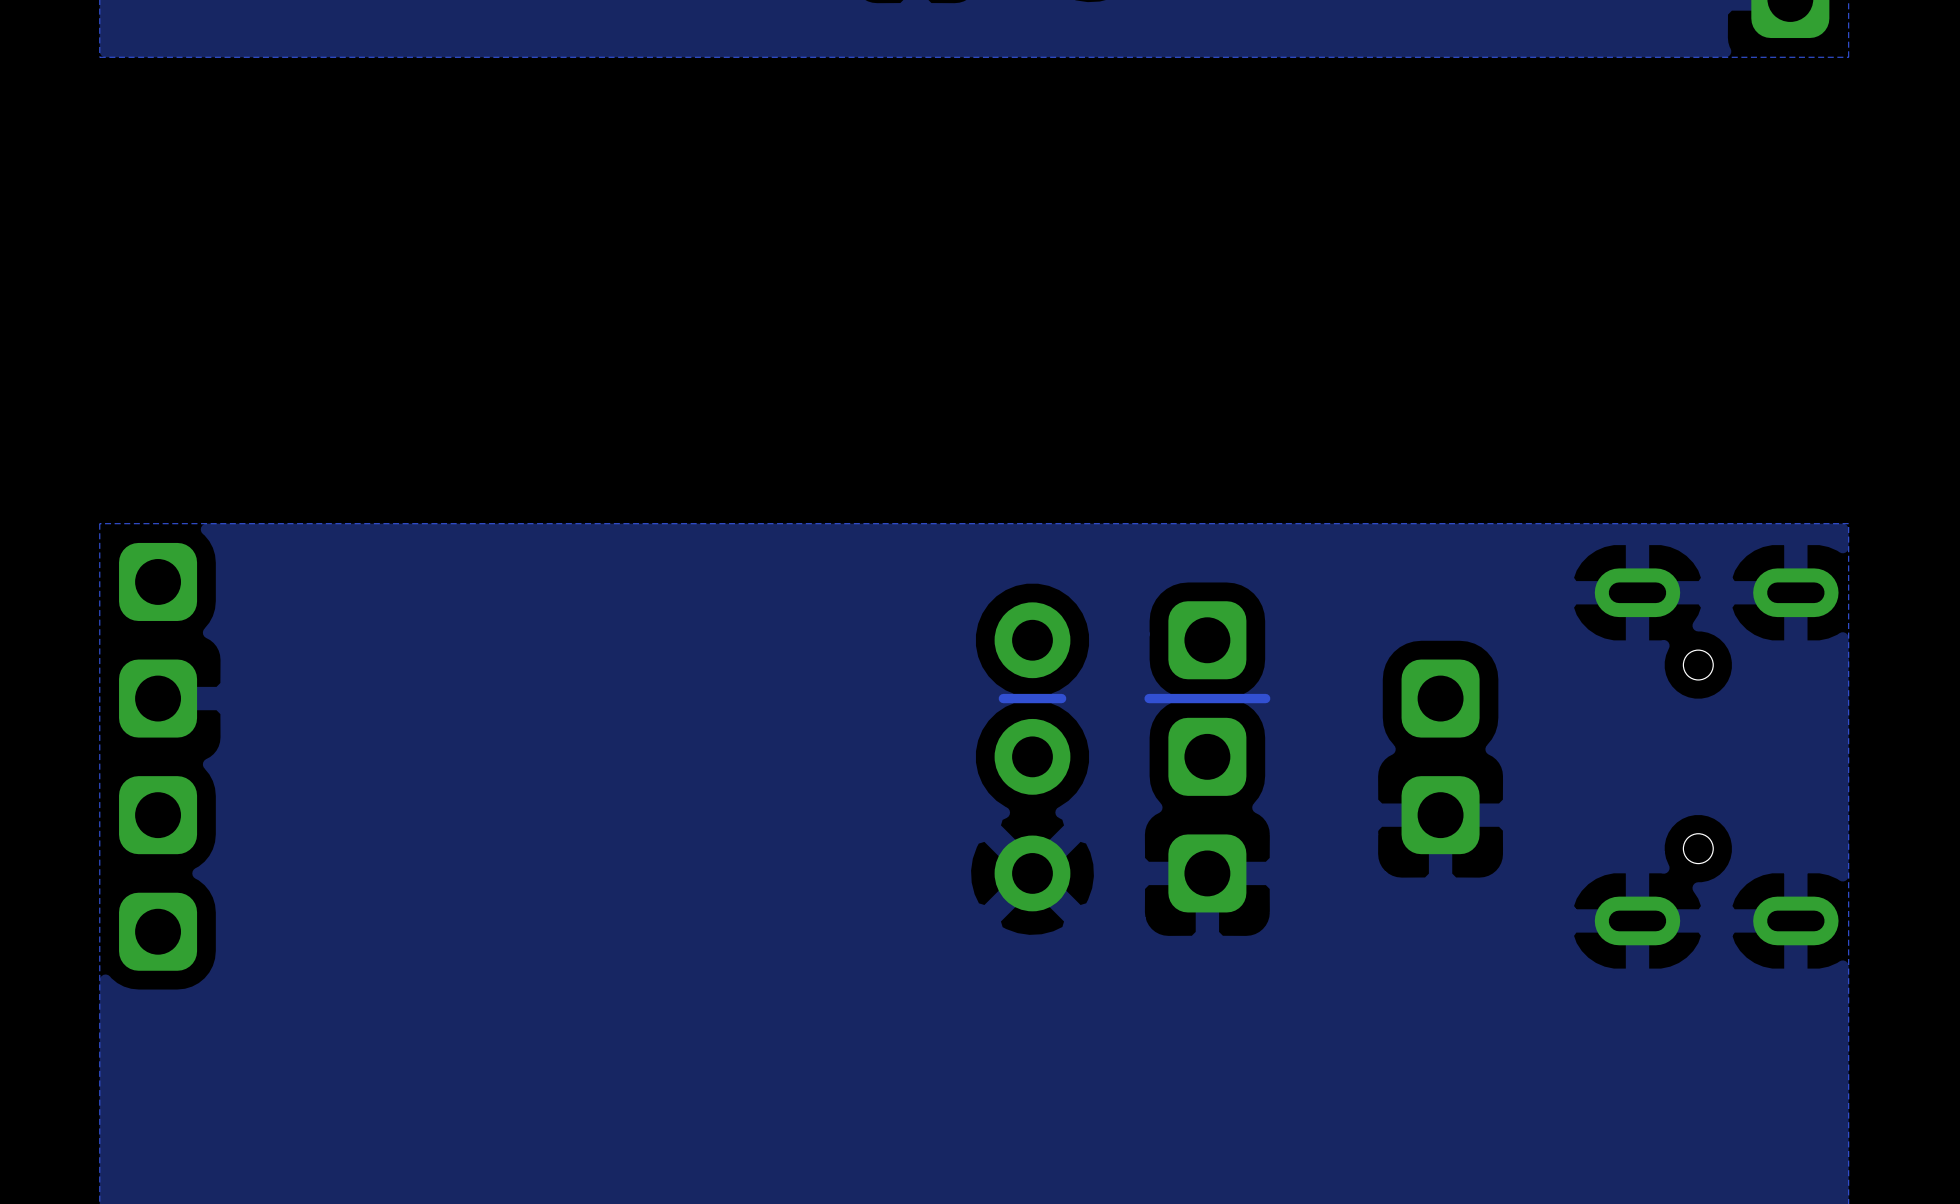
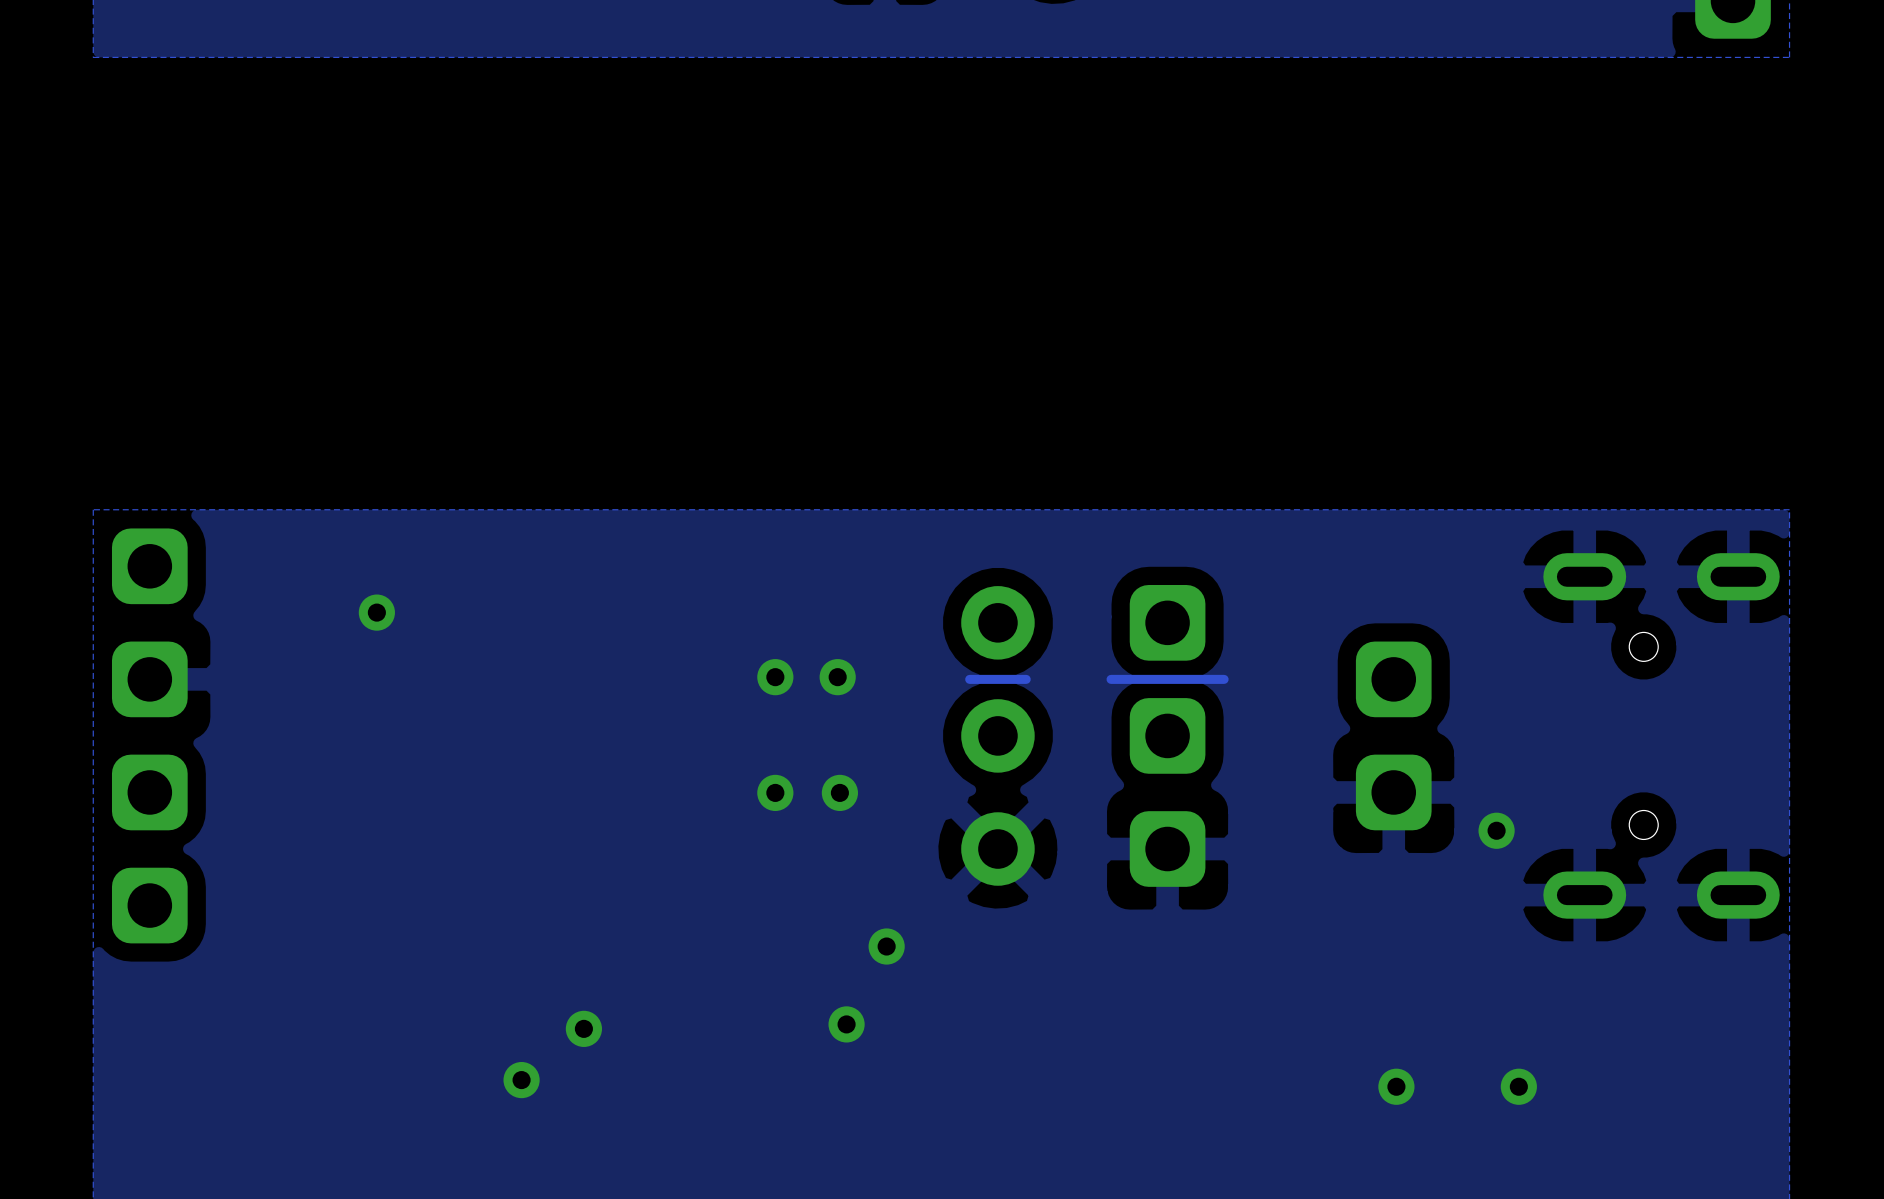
via: none -> (376, 612)
via: none -> (775, 677)
via: none -> (837, 677)
via: none -> (775, 792)
via: none -> (839, 792)
via: none -> (1496, 830)
via: none -> (886, 946)
via: none -> (846, 1024)
via: none -> (583, 1028)
via: none -> (521, 1080)
via: none -> (1396, 1086)
via: none -> (1518, 1086)

